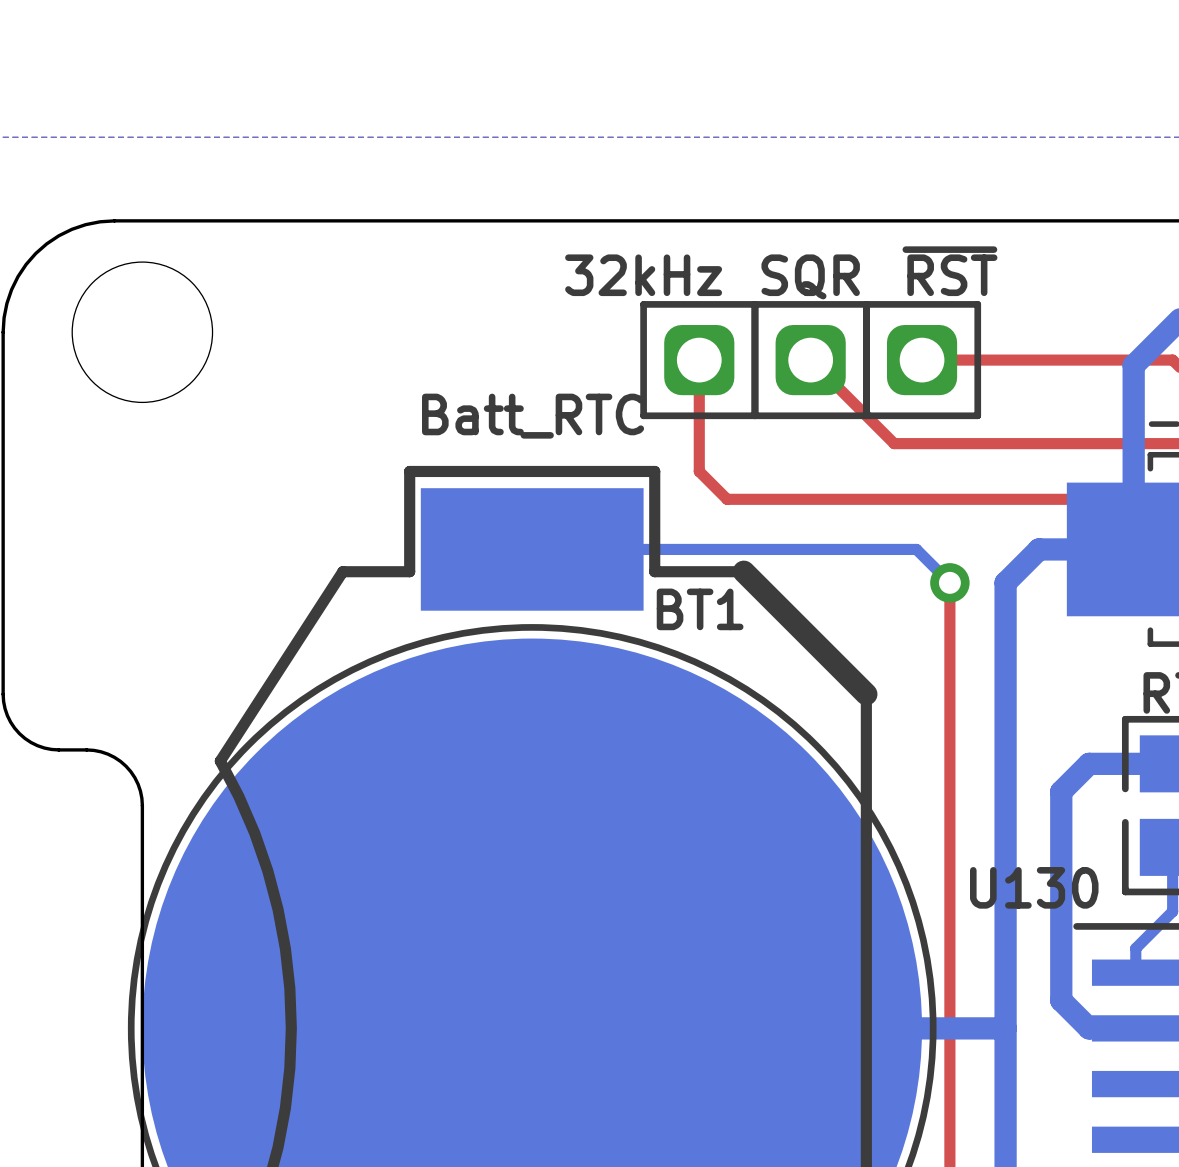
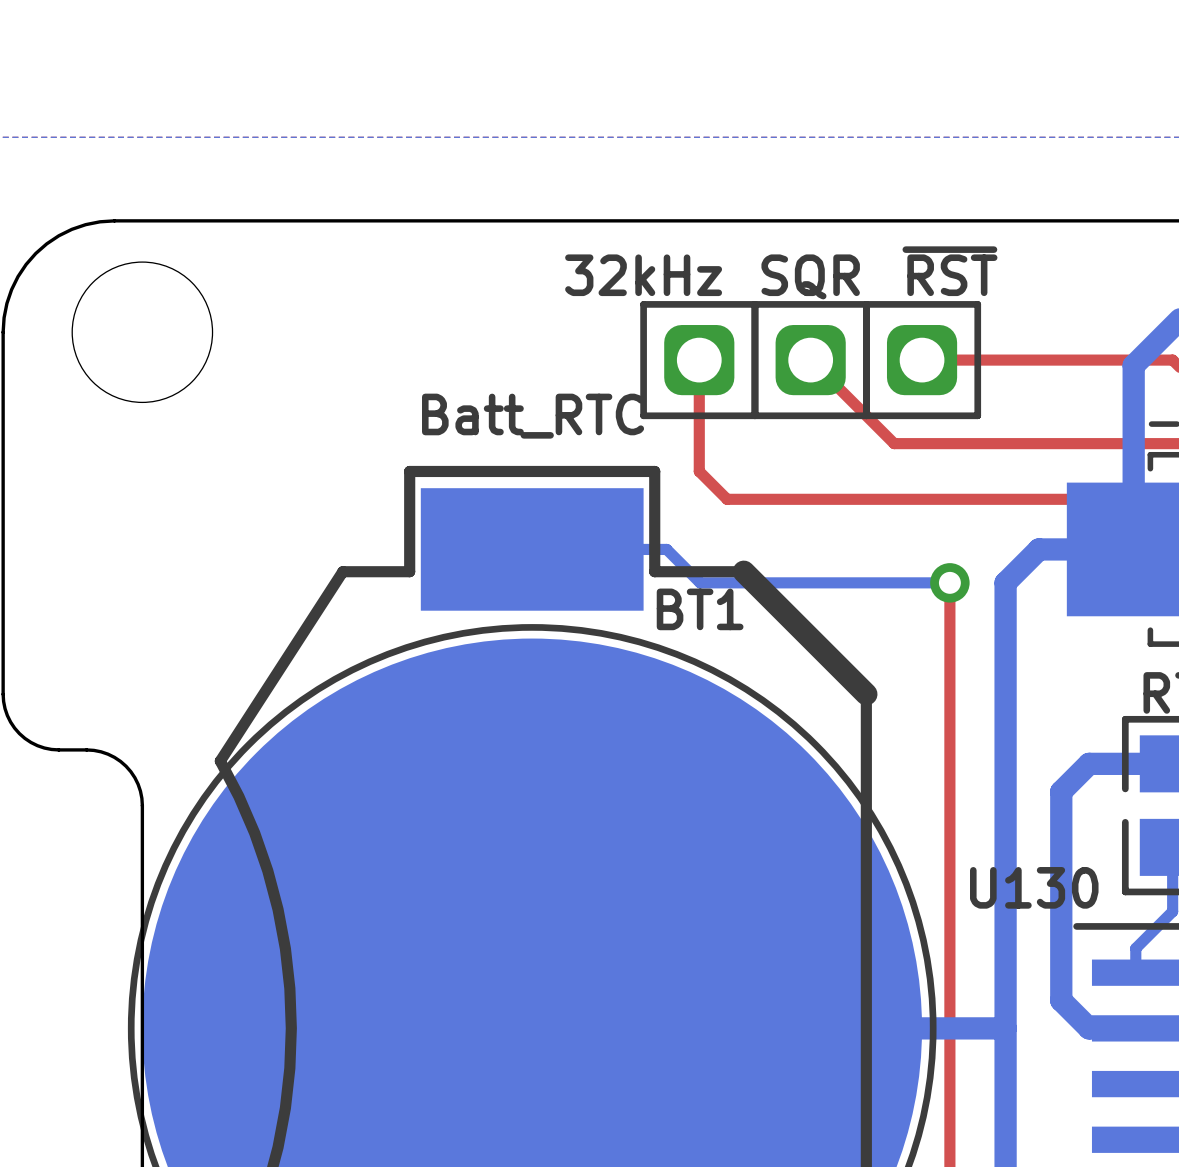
bottom track: (666, 549) (916, 549) (949, 582) -> (666, 549) (700, 582) (949, 582)

